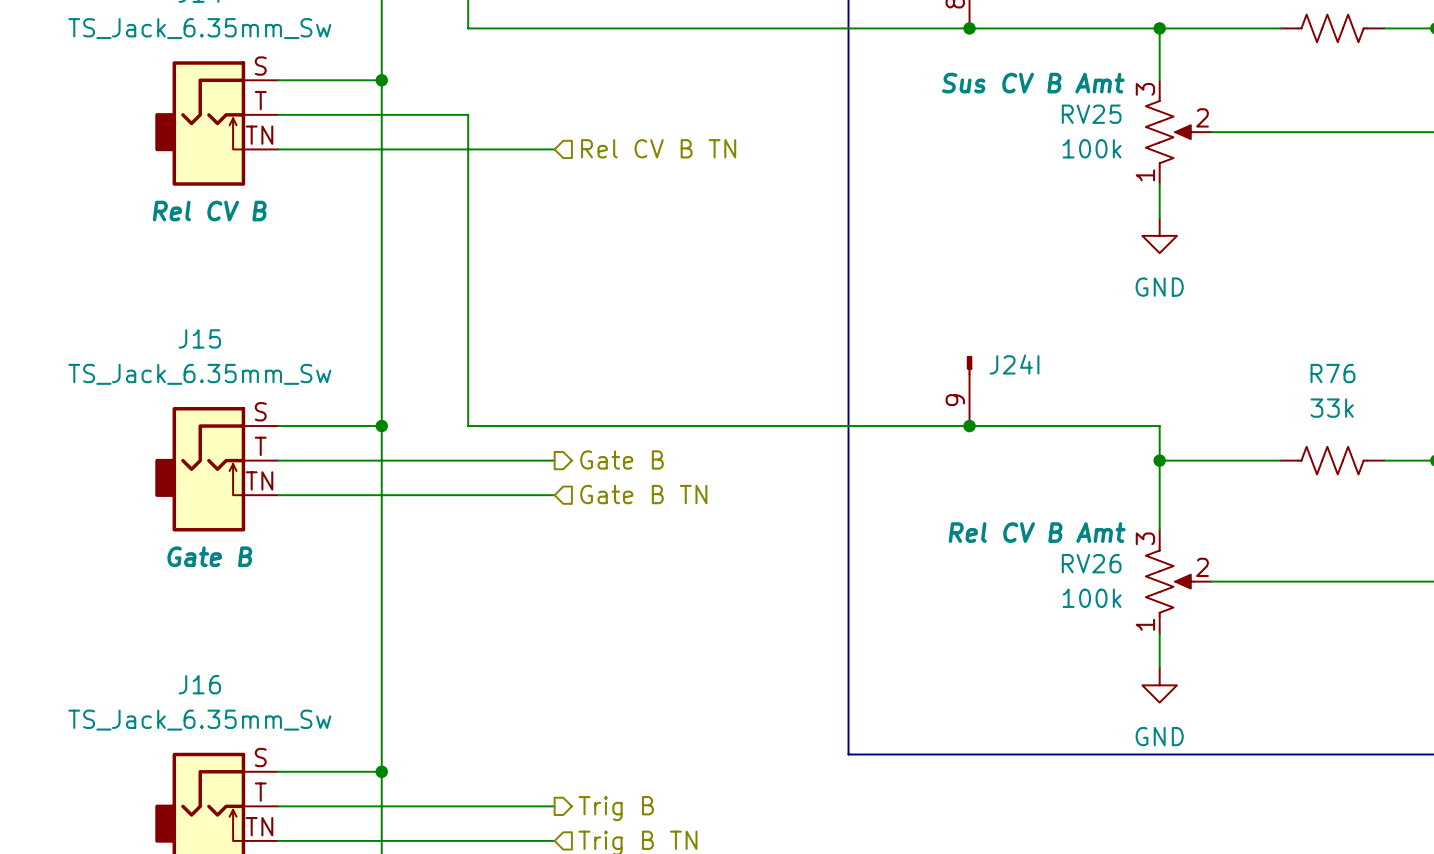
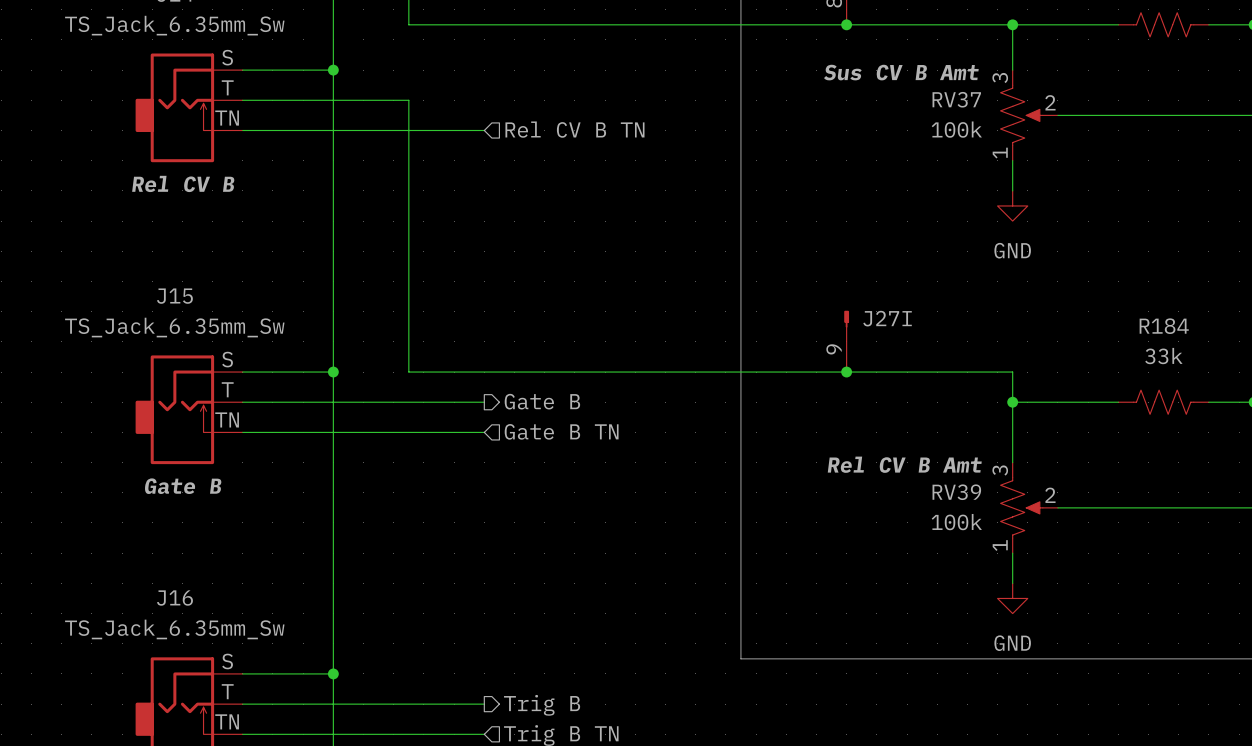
RV25 name: RV25 (1091, 114) -> RV37 (956, 99)
J24I name: J24I (1014, 364) -> J27I (887, 318)
R76 name: R76 (1332, 373) -> R184 (1164, 326)
RV26 name: RV26 (1091, 563) -> RV39 (956, 492)

